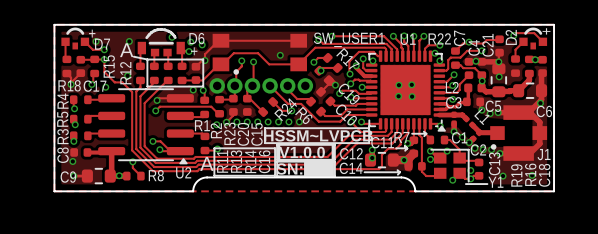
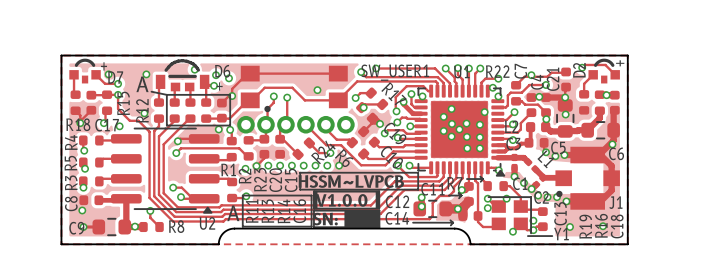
via: none -> (451, 109)
via: none -> (484, 112)
via: none -> (443, 116)
via: none -> (479, 124)
via: none -> (459, 129)
via: none -> (443, 131)
via: none -> (479, 137)
via: none -> (467, 148)
via: none -> (479, 148)

